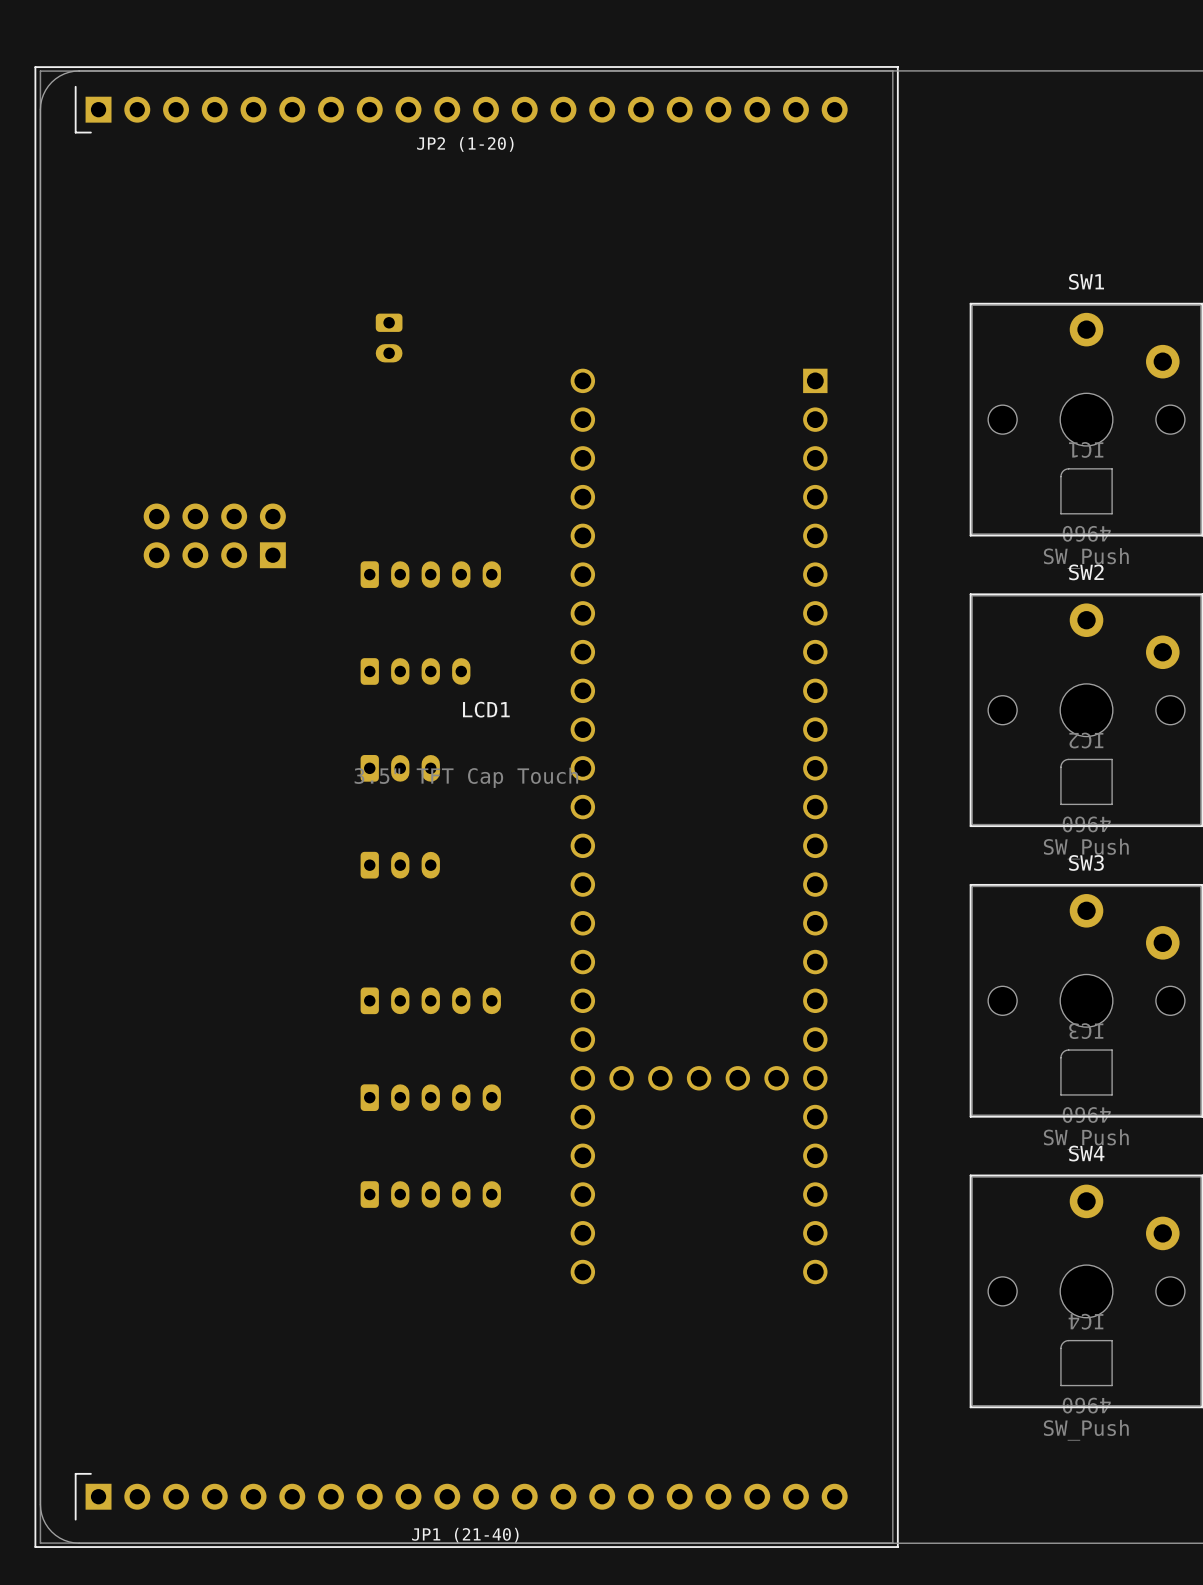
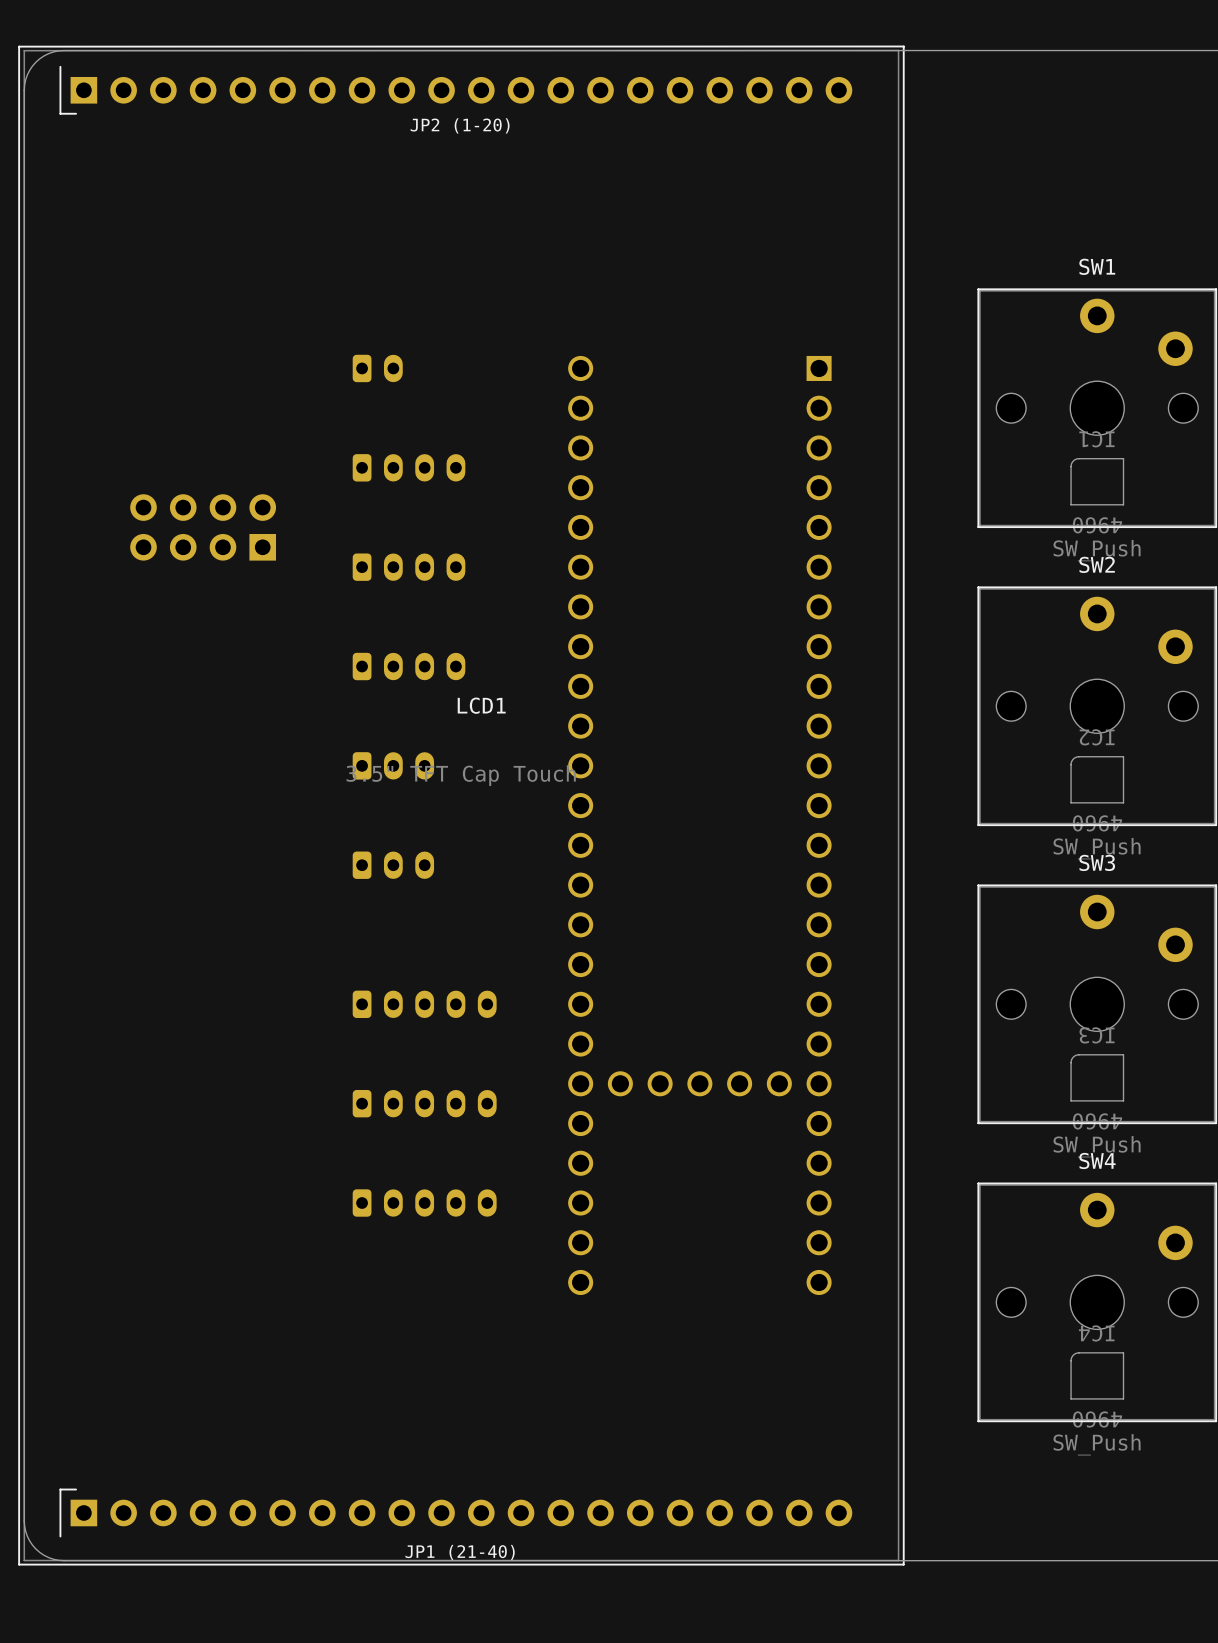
part rotation: 0° (389, 338) -> 90° counterclockwise (377, 368)
part position: (389, 338) -> (377, 368)
part: none -> (409, 467)
part footprint: [360, 561, 501, 588] -> [352, 553, 466, 581]

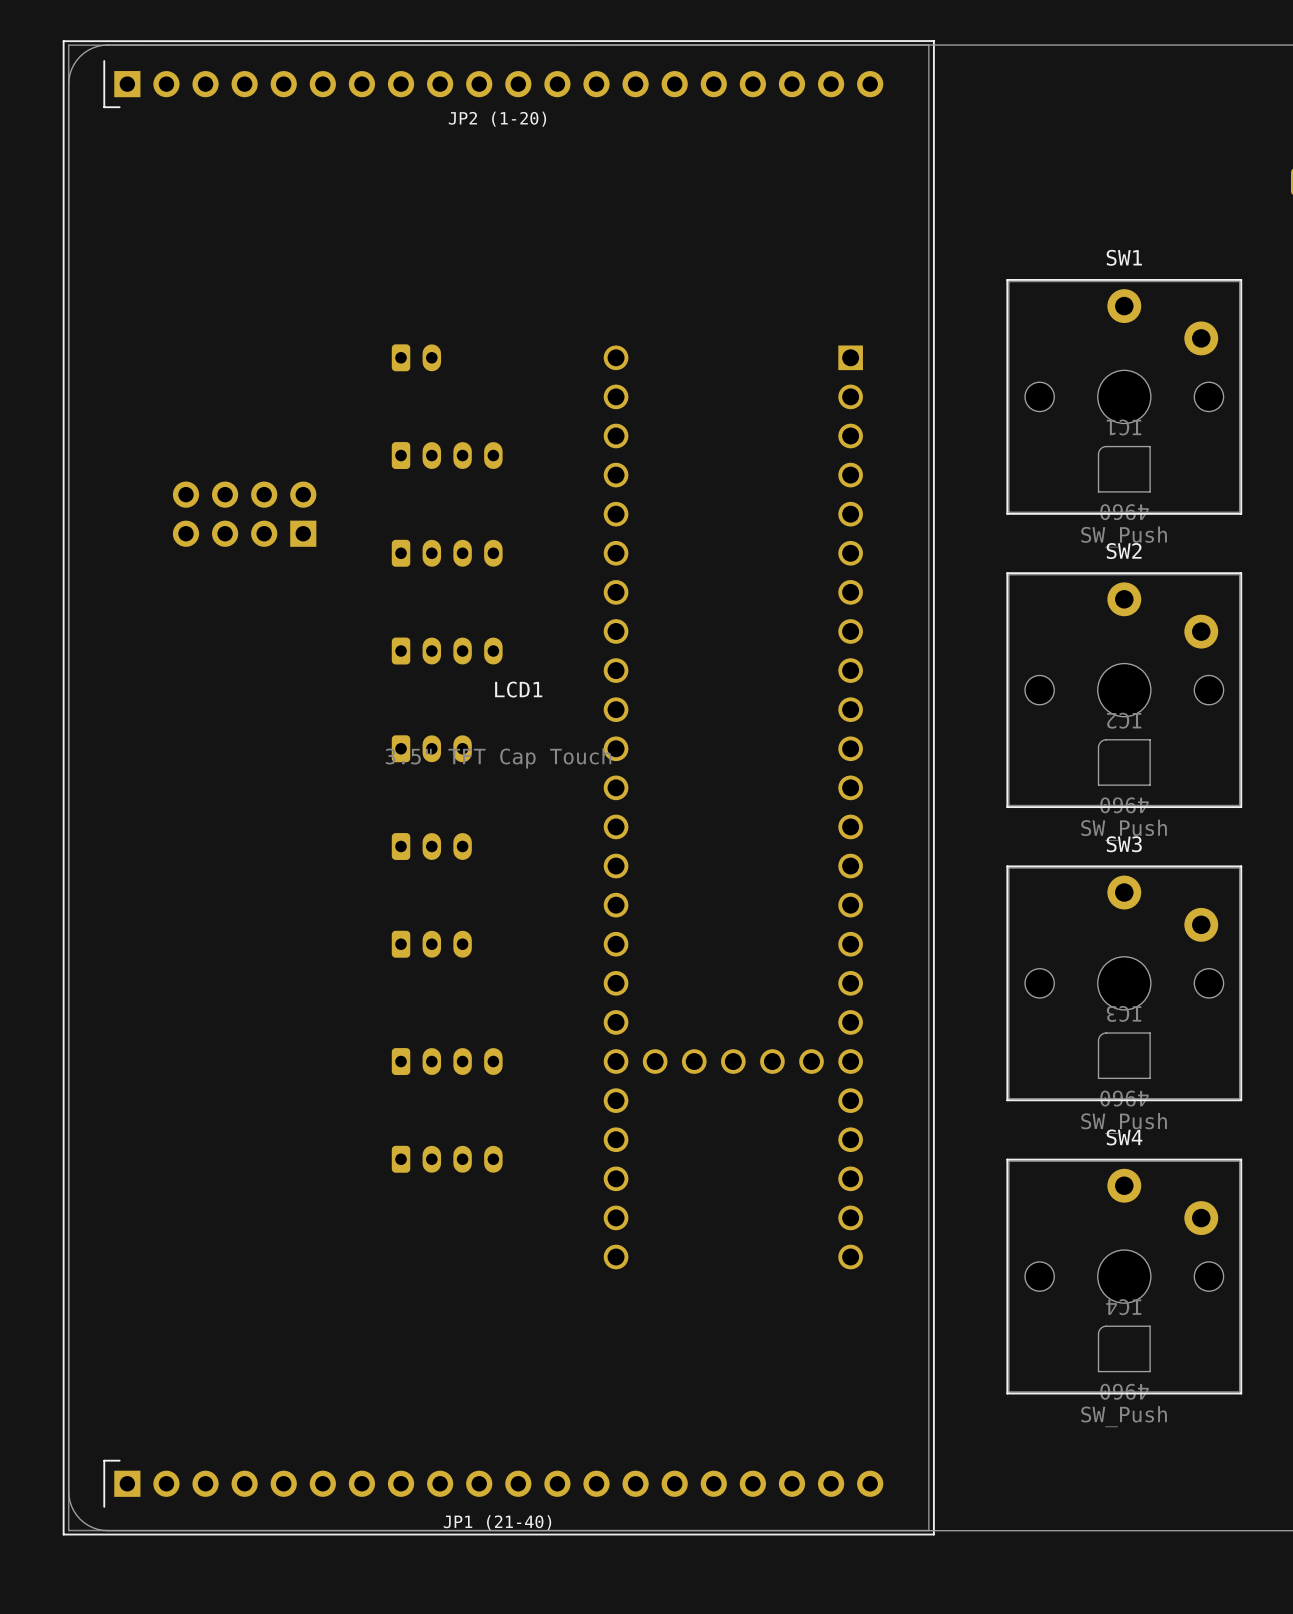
part: none -> (431, 944)
part: (424, 1004) -> none
part: none -> (447, 1061)
part: (424, 1103) -> none
part: none -> (447, 1159)
part: (424, 1203) -> none

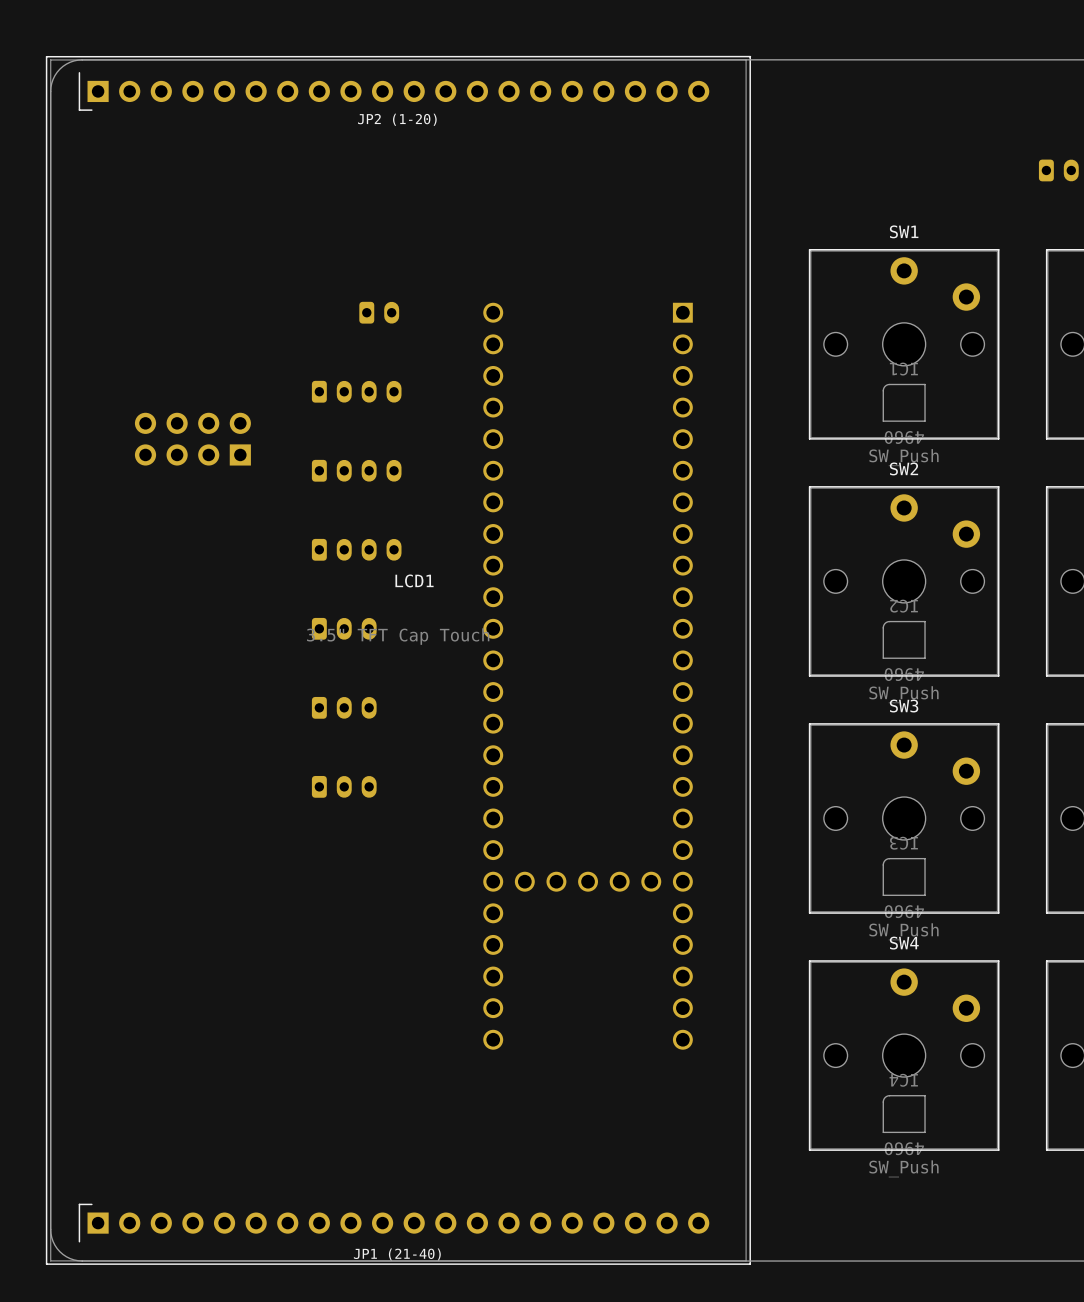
part position: (416, 357) -> (379, 312)
part: (447, 1061) -> none
part: (447, 1159) -> none

